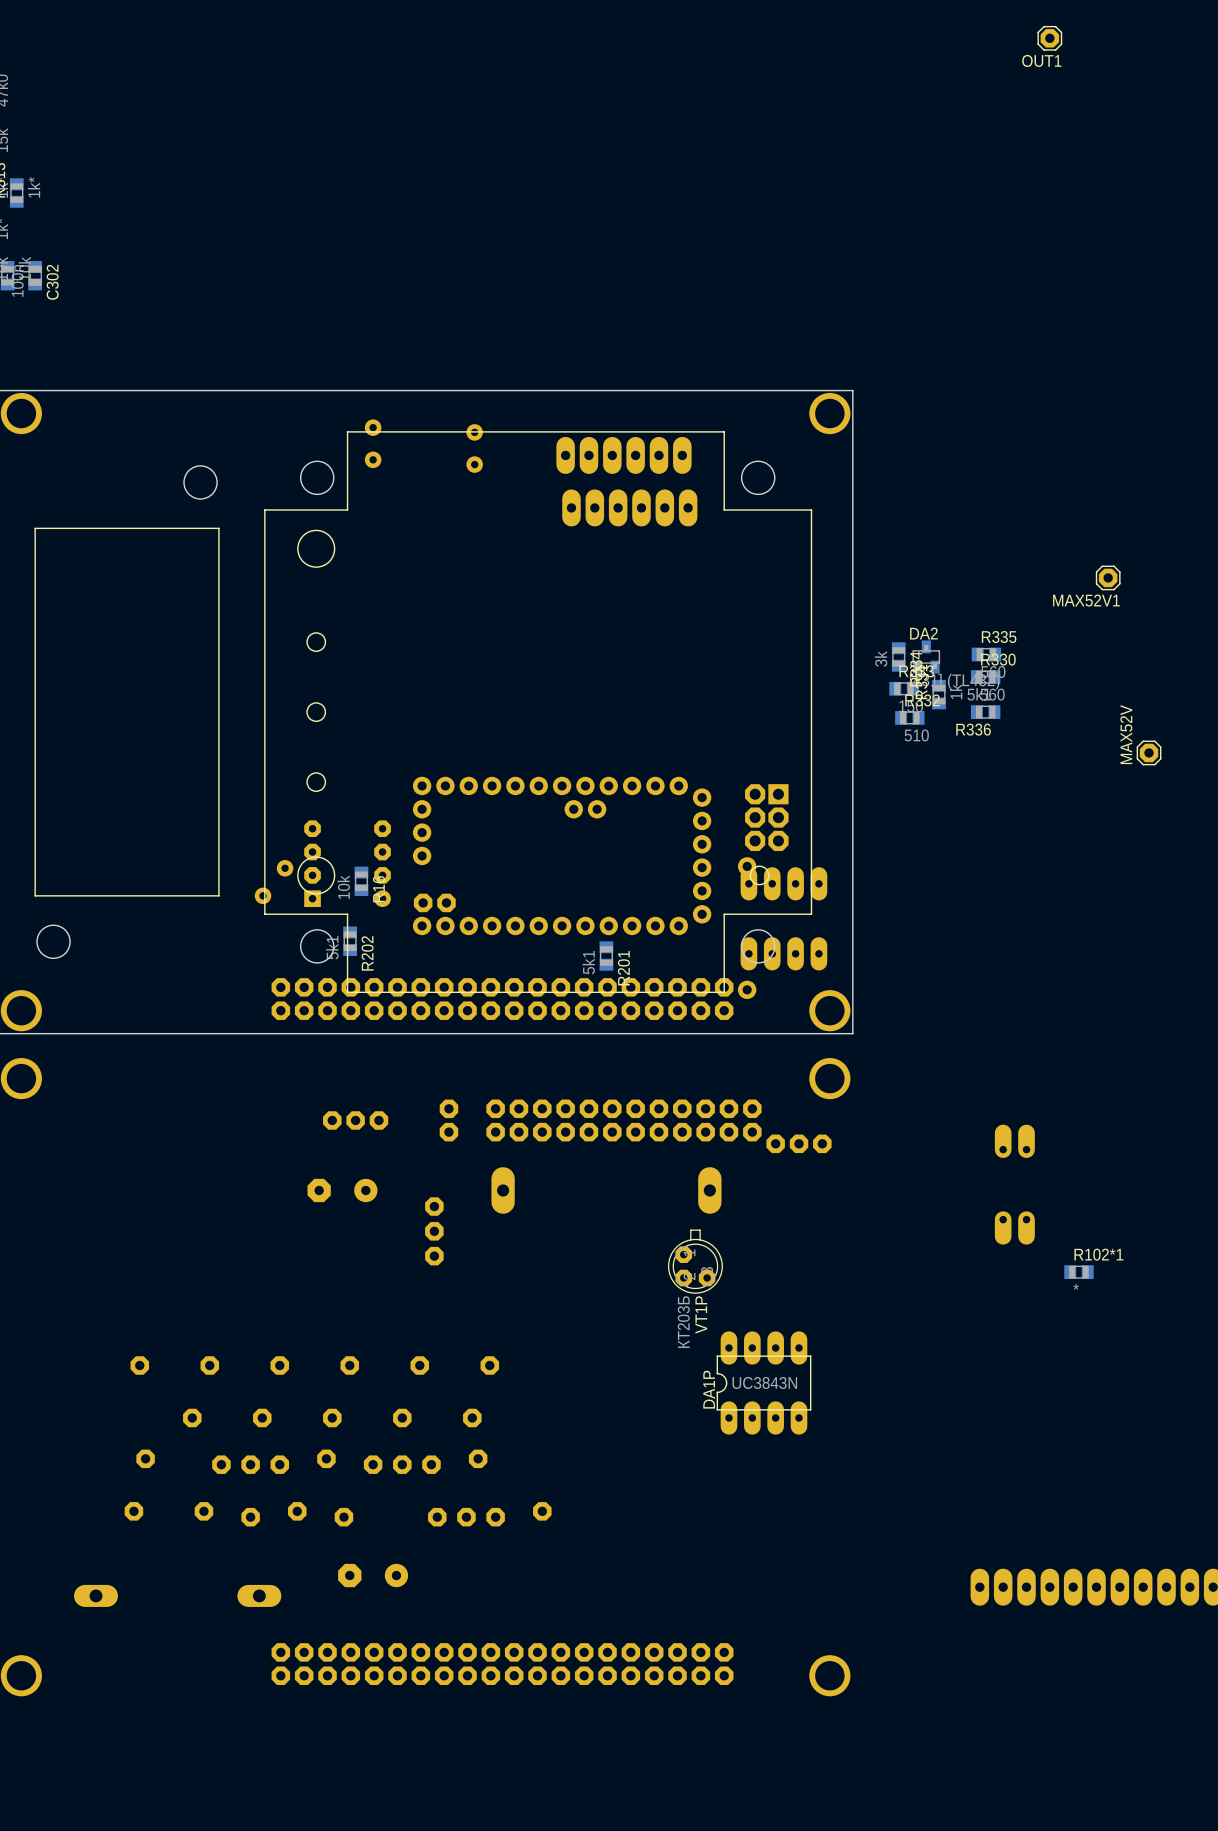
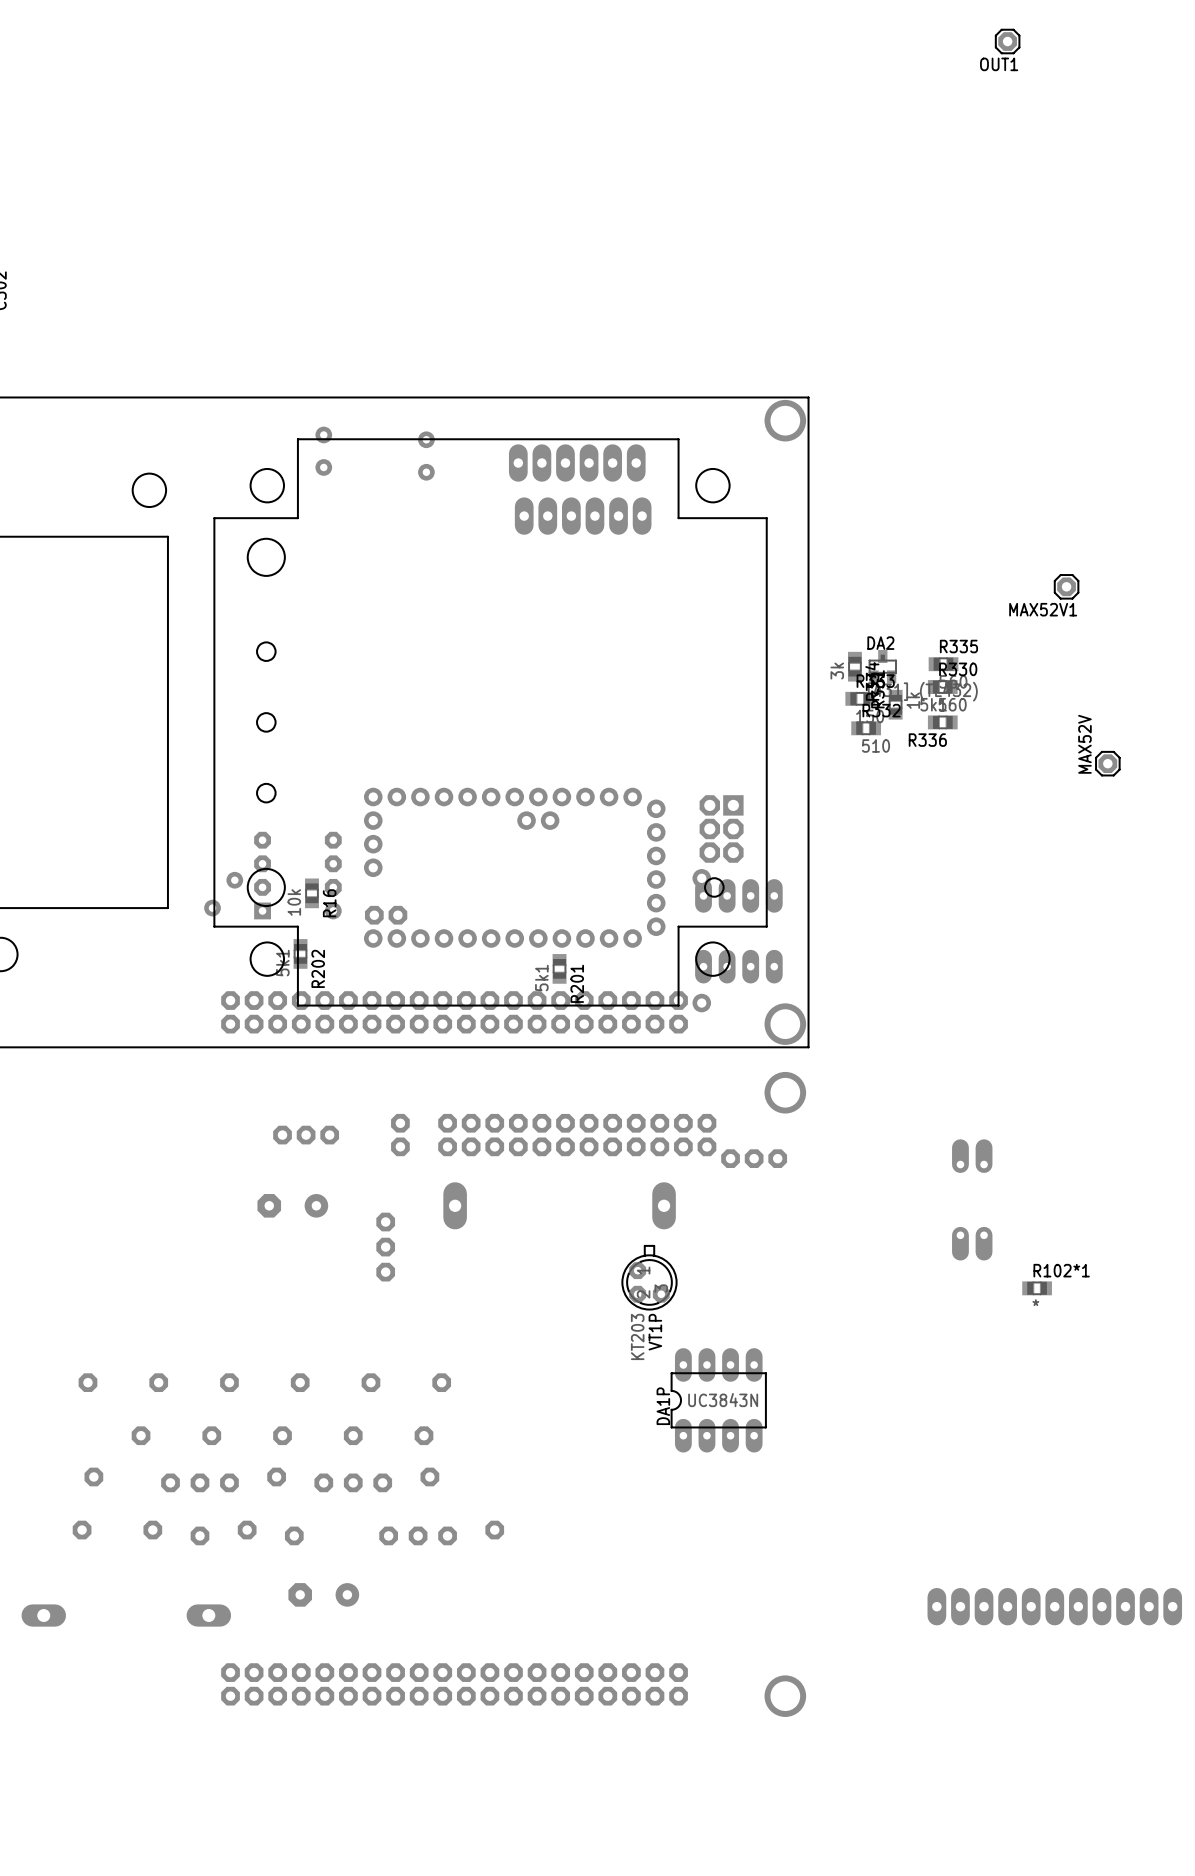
VT1P value: КТ203Б (683, 1322) -> КТ203 (637, 1336)

